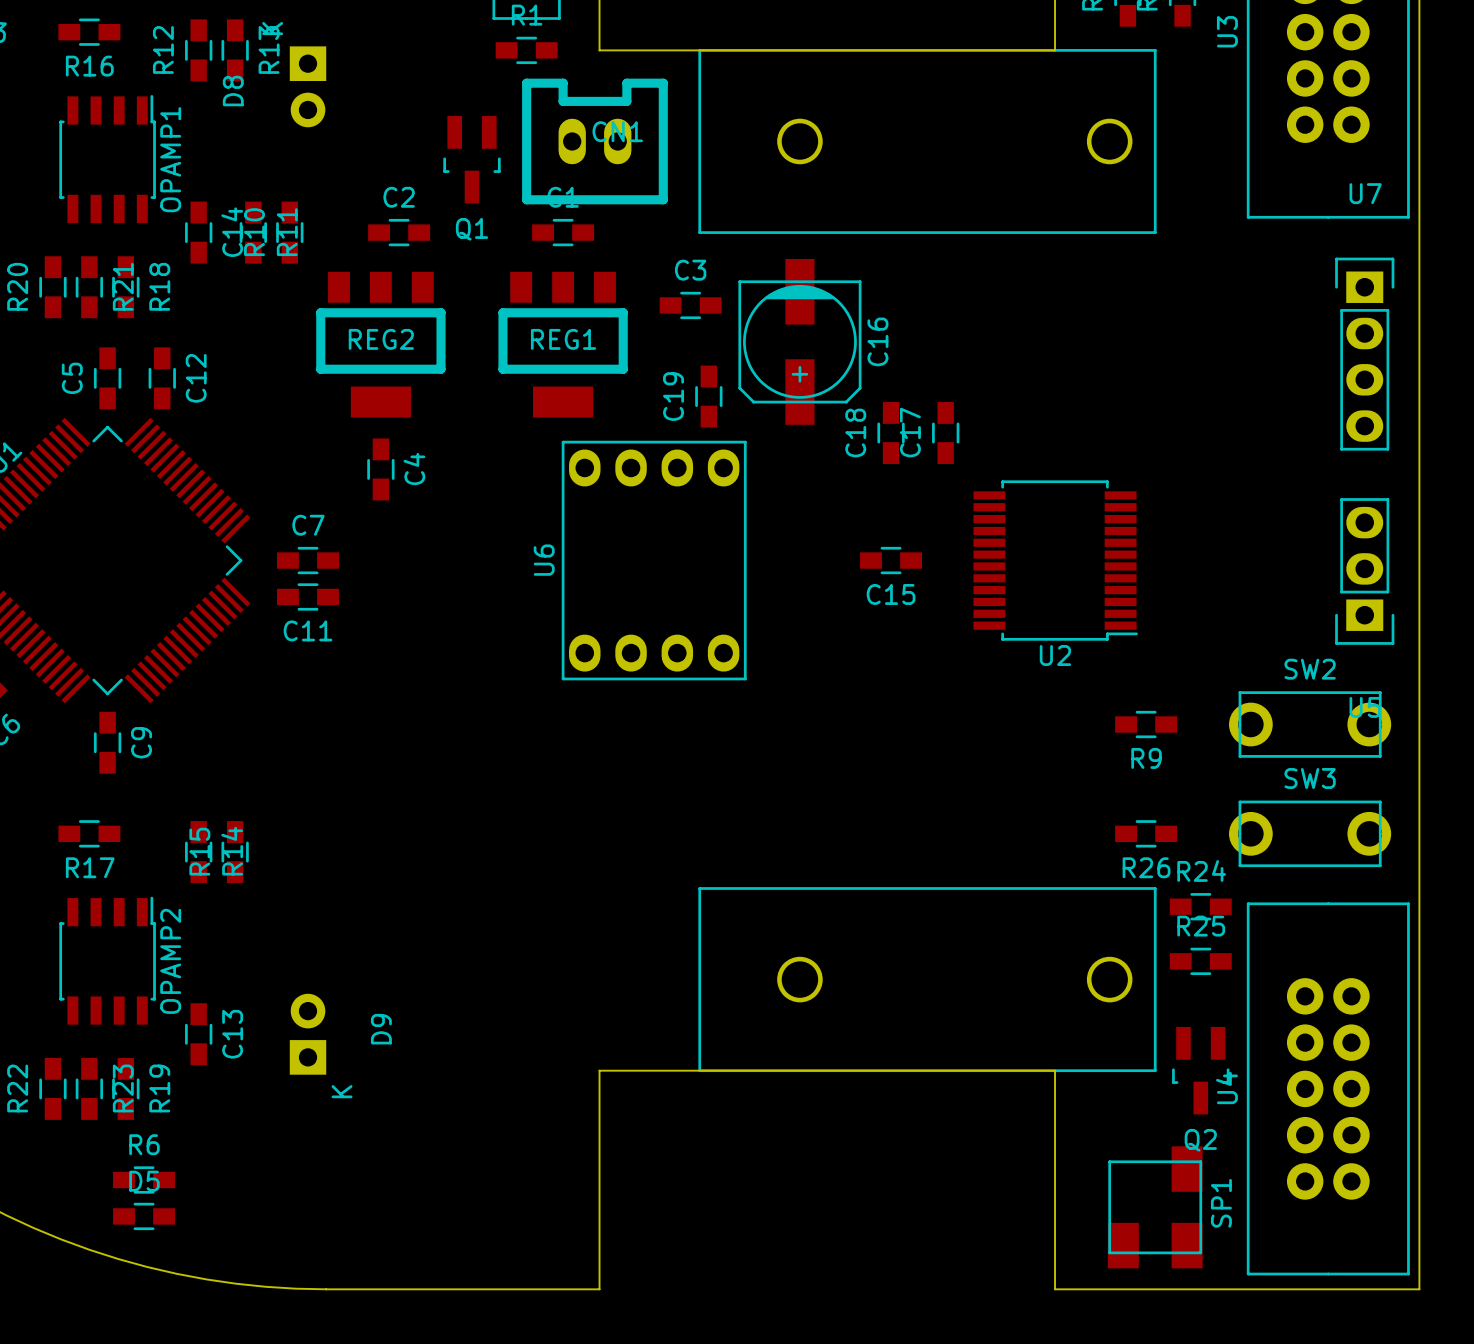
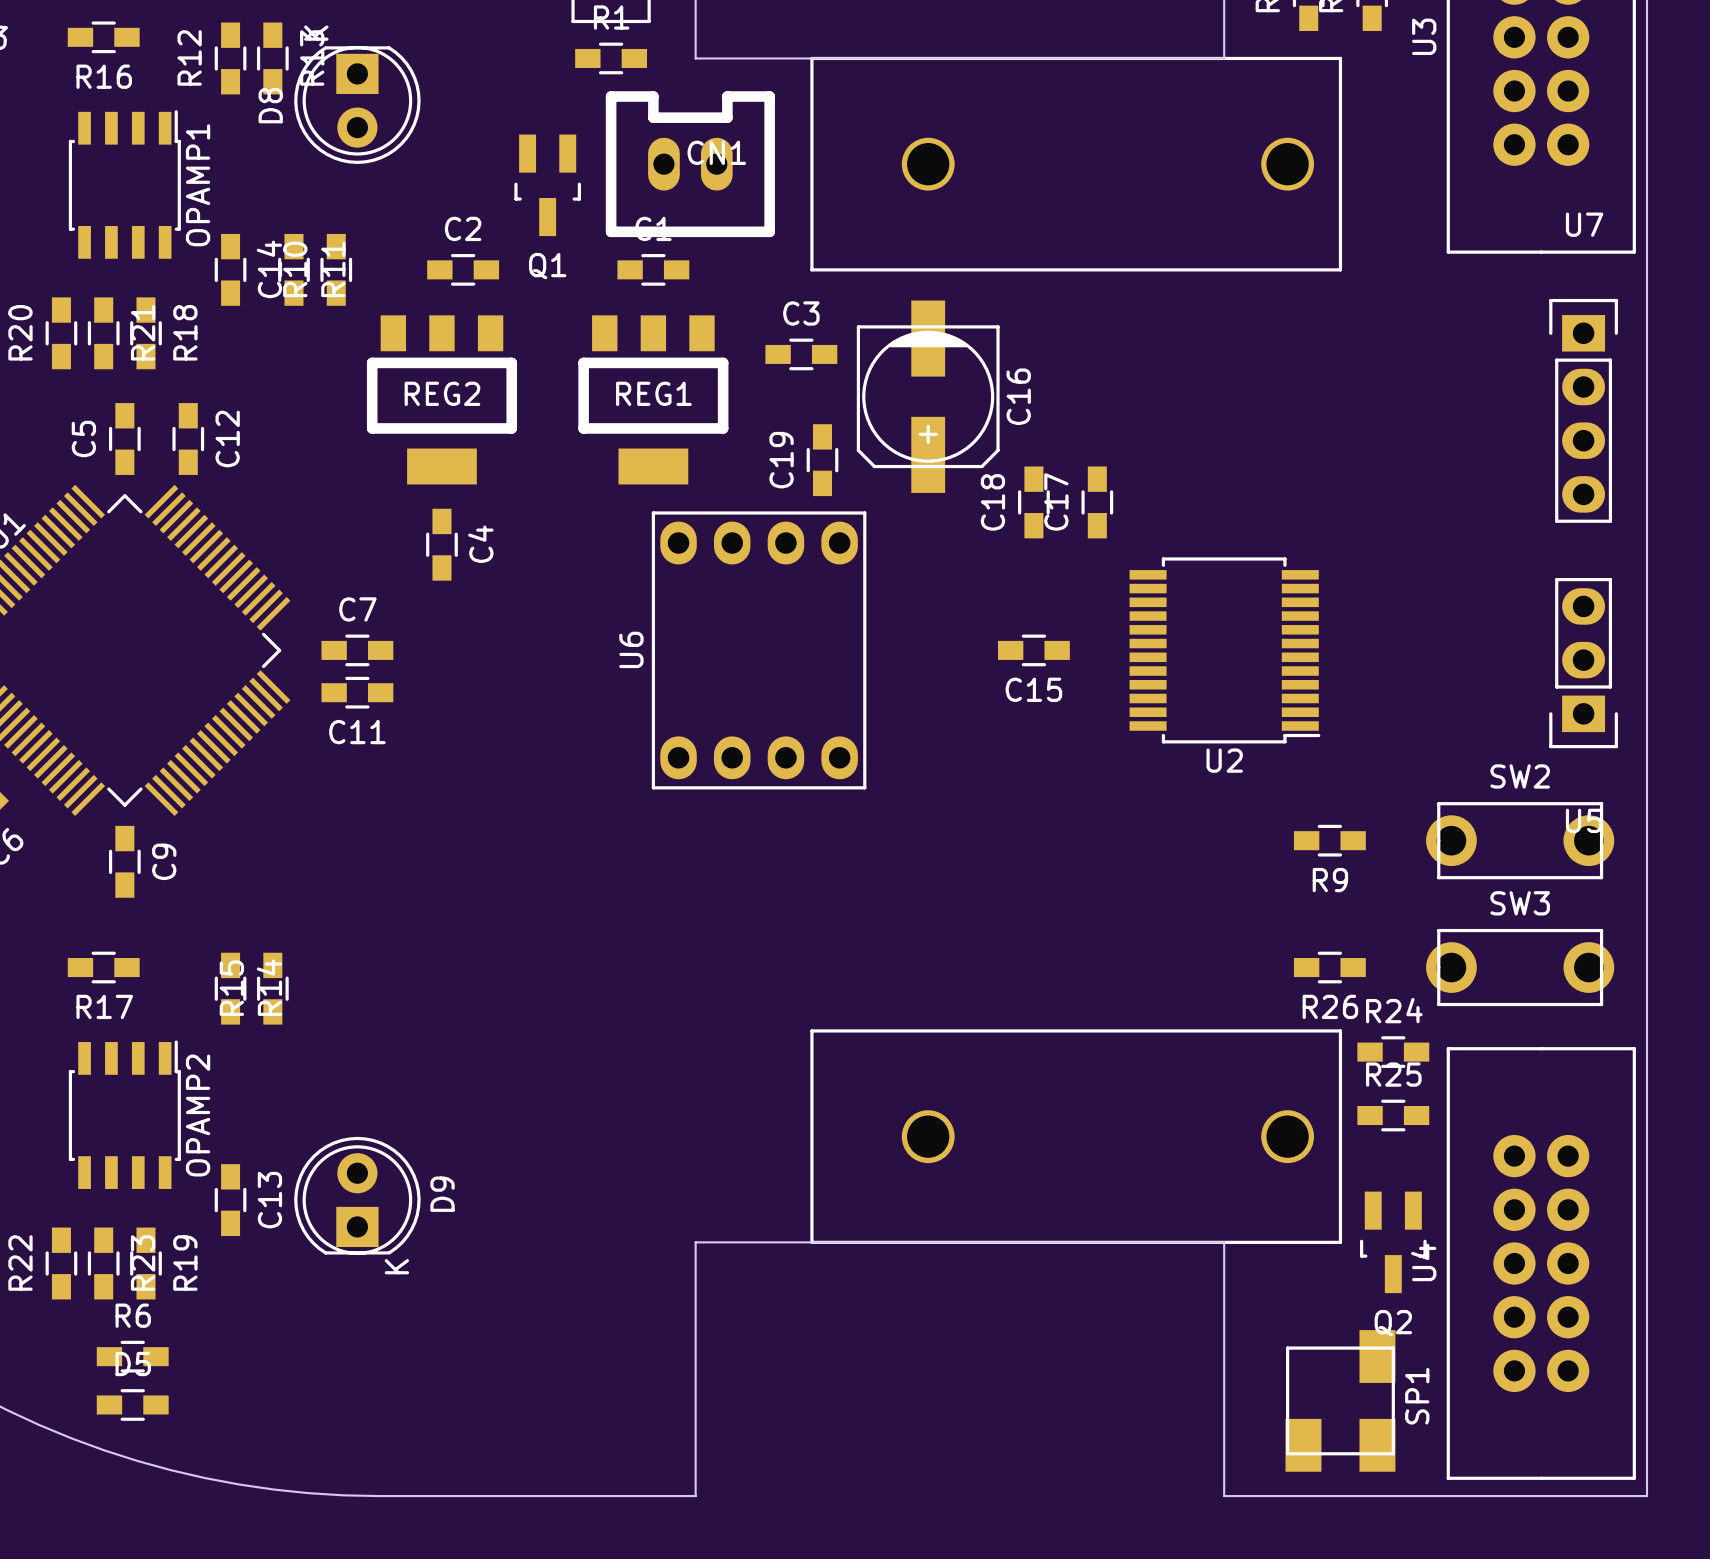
D8 footprint: [289, 46, 327, 128] -> [294, 45, 421, 164]
D9 footprint: [289, 993, 327, 1075] -> [294, 1136, 421, 1255]
R6 position: (144, 1180) -> (132, 1356)
D5 position: (144, 1216) -> (132, 1404)

